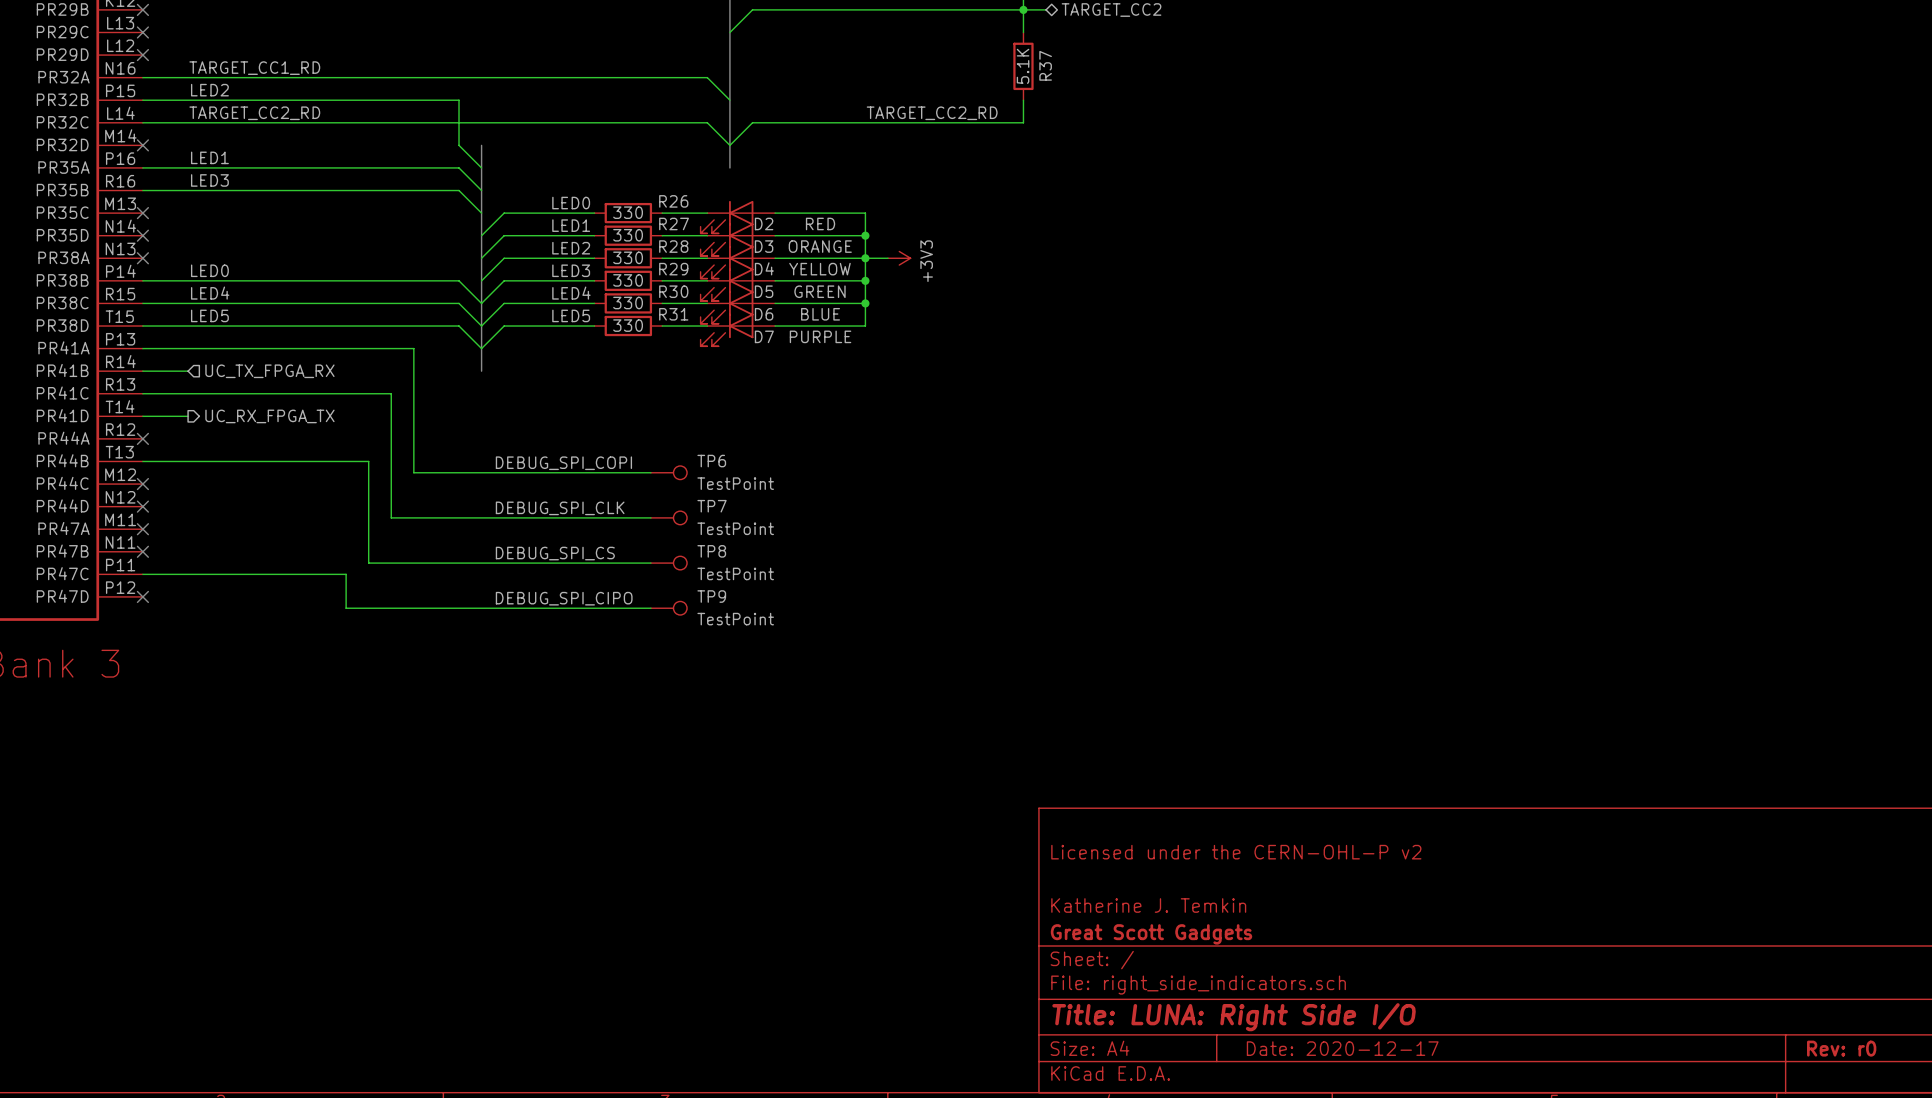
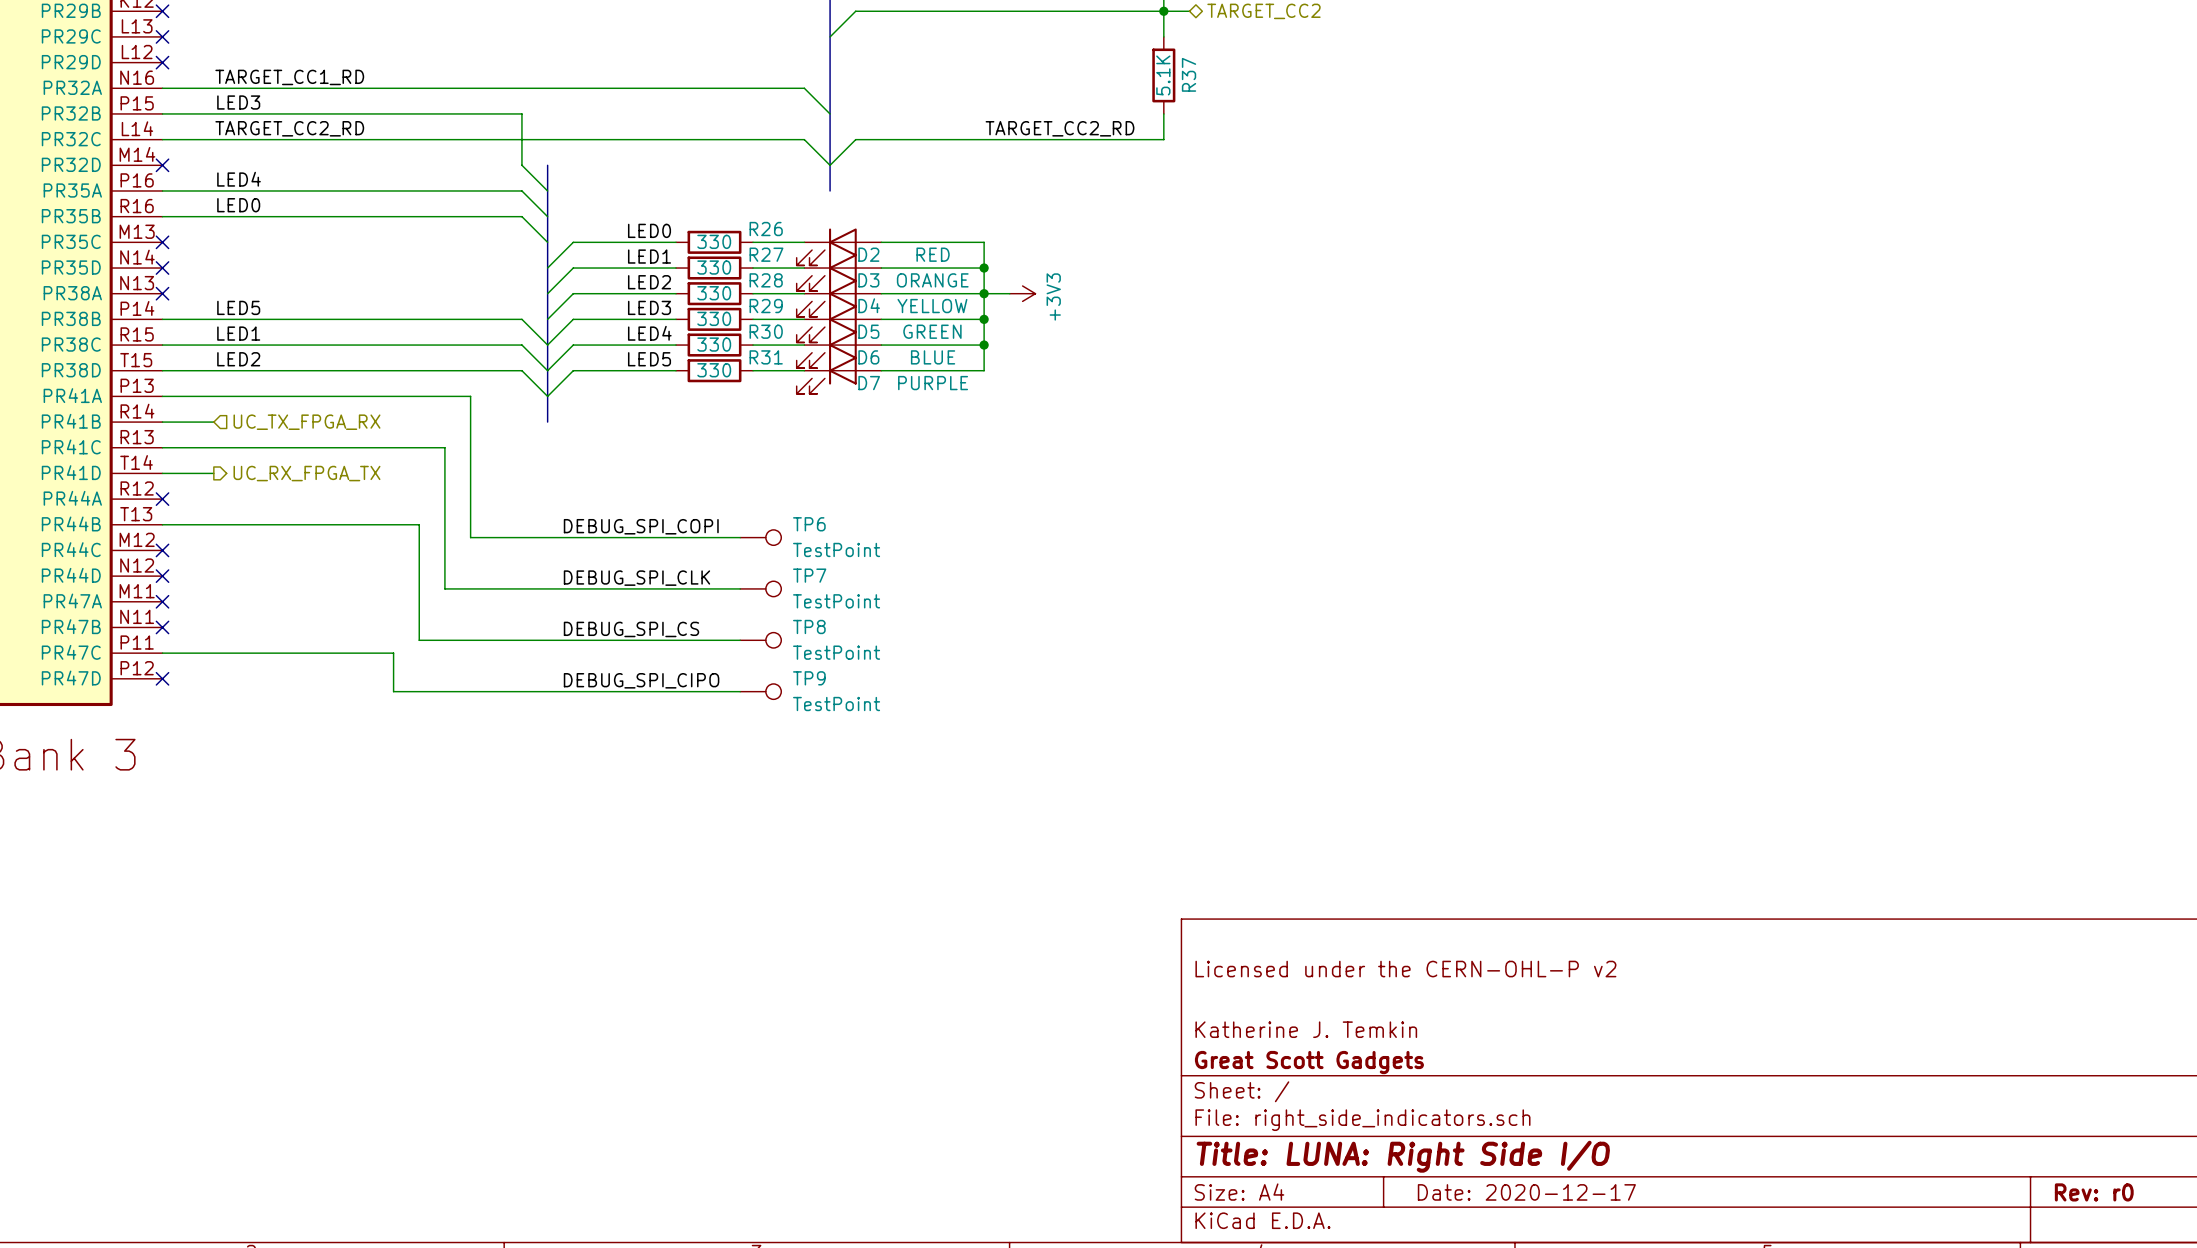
label: LED2 (209, 90) -> LED3 (238, 102)
label: LED1 (209, 157) -> LED4 (239, 179)
label: LED3 (209, 180) -> LED0 (238, 205)
label: LED0 (209, 270) -> LED5 (238, 307)
label: LED4 (210, 293) -> LED1 (238, 333)
label: LED5 (209, 315) -> LED2 (238, 359)

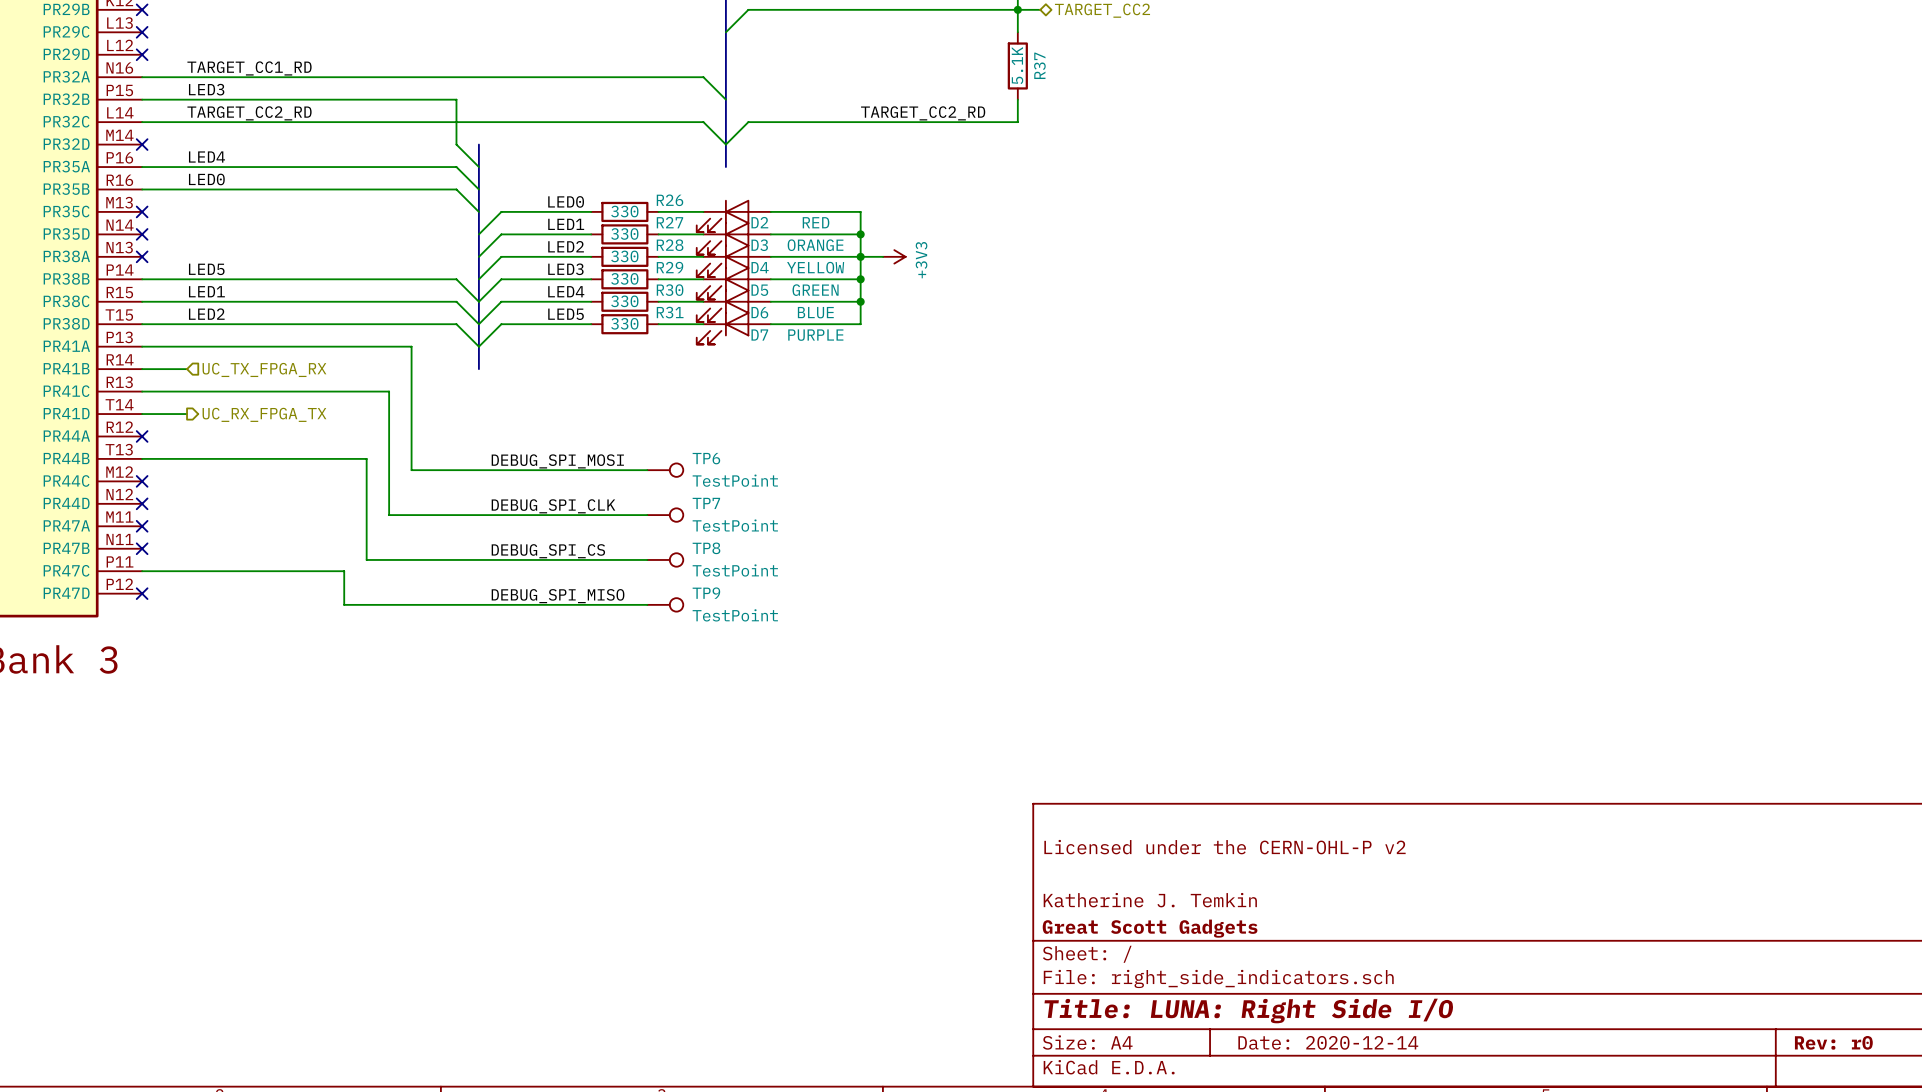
label: DEBUG_SPI_COPI (641, 526) -> DEBUG_SPI_MOSI (557, 461)
label: DEBUG_SPI_CIPO (641, 680) -> DEBUG_SPI_MISO (558, 596)
title block: Date: 2020-12-17 (1526, 1192) -> Date: 2020-12-14 (1328, 1042)

